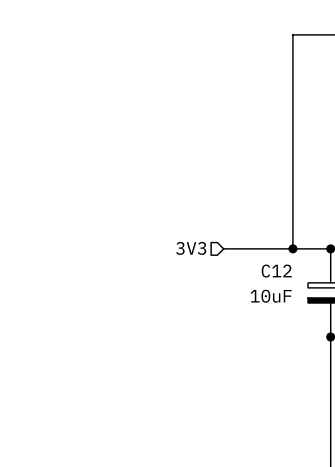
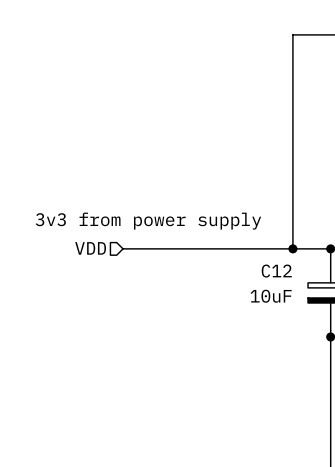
text: none -> 3v3 from power supply (148, 221)
hierarchical label: none -> VDD (90, 248)
wire: none -> (123, 248) (223, 248)
hierarchical label: 3V3 (191, 248) -> none

